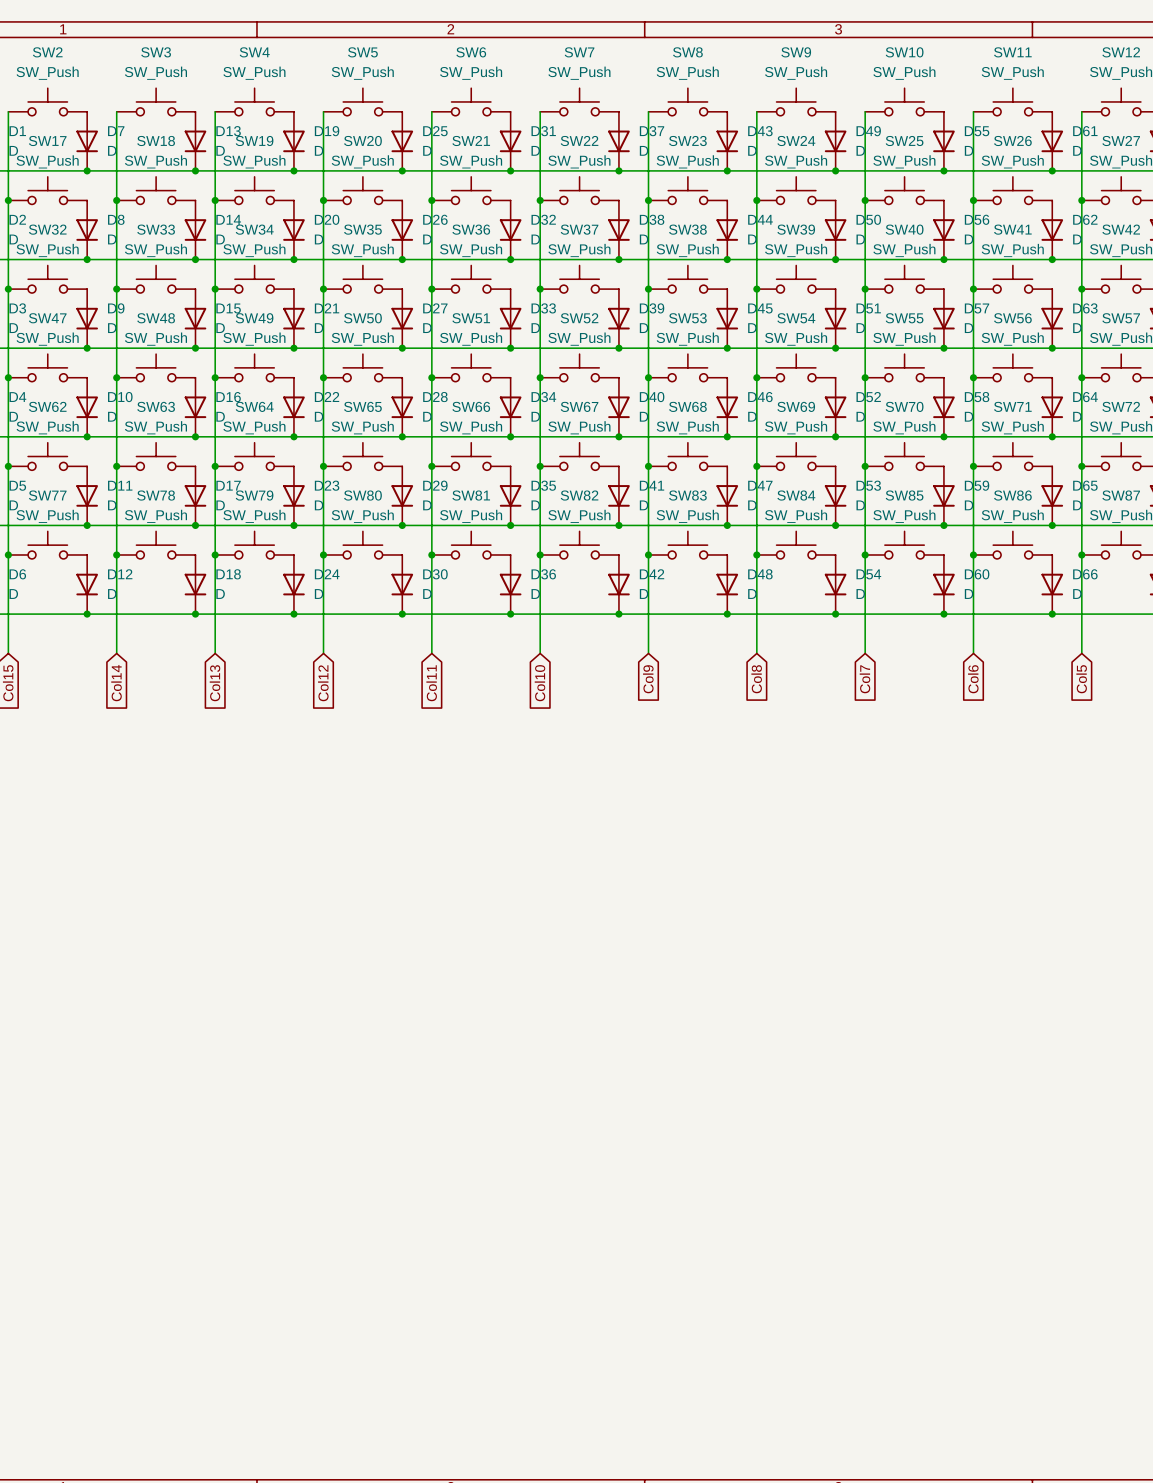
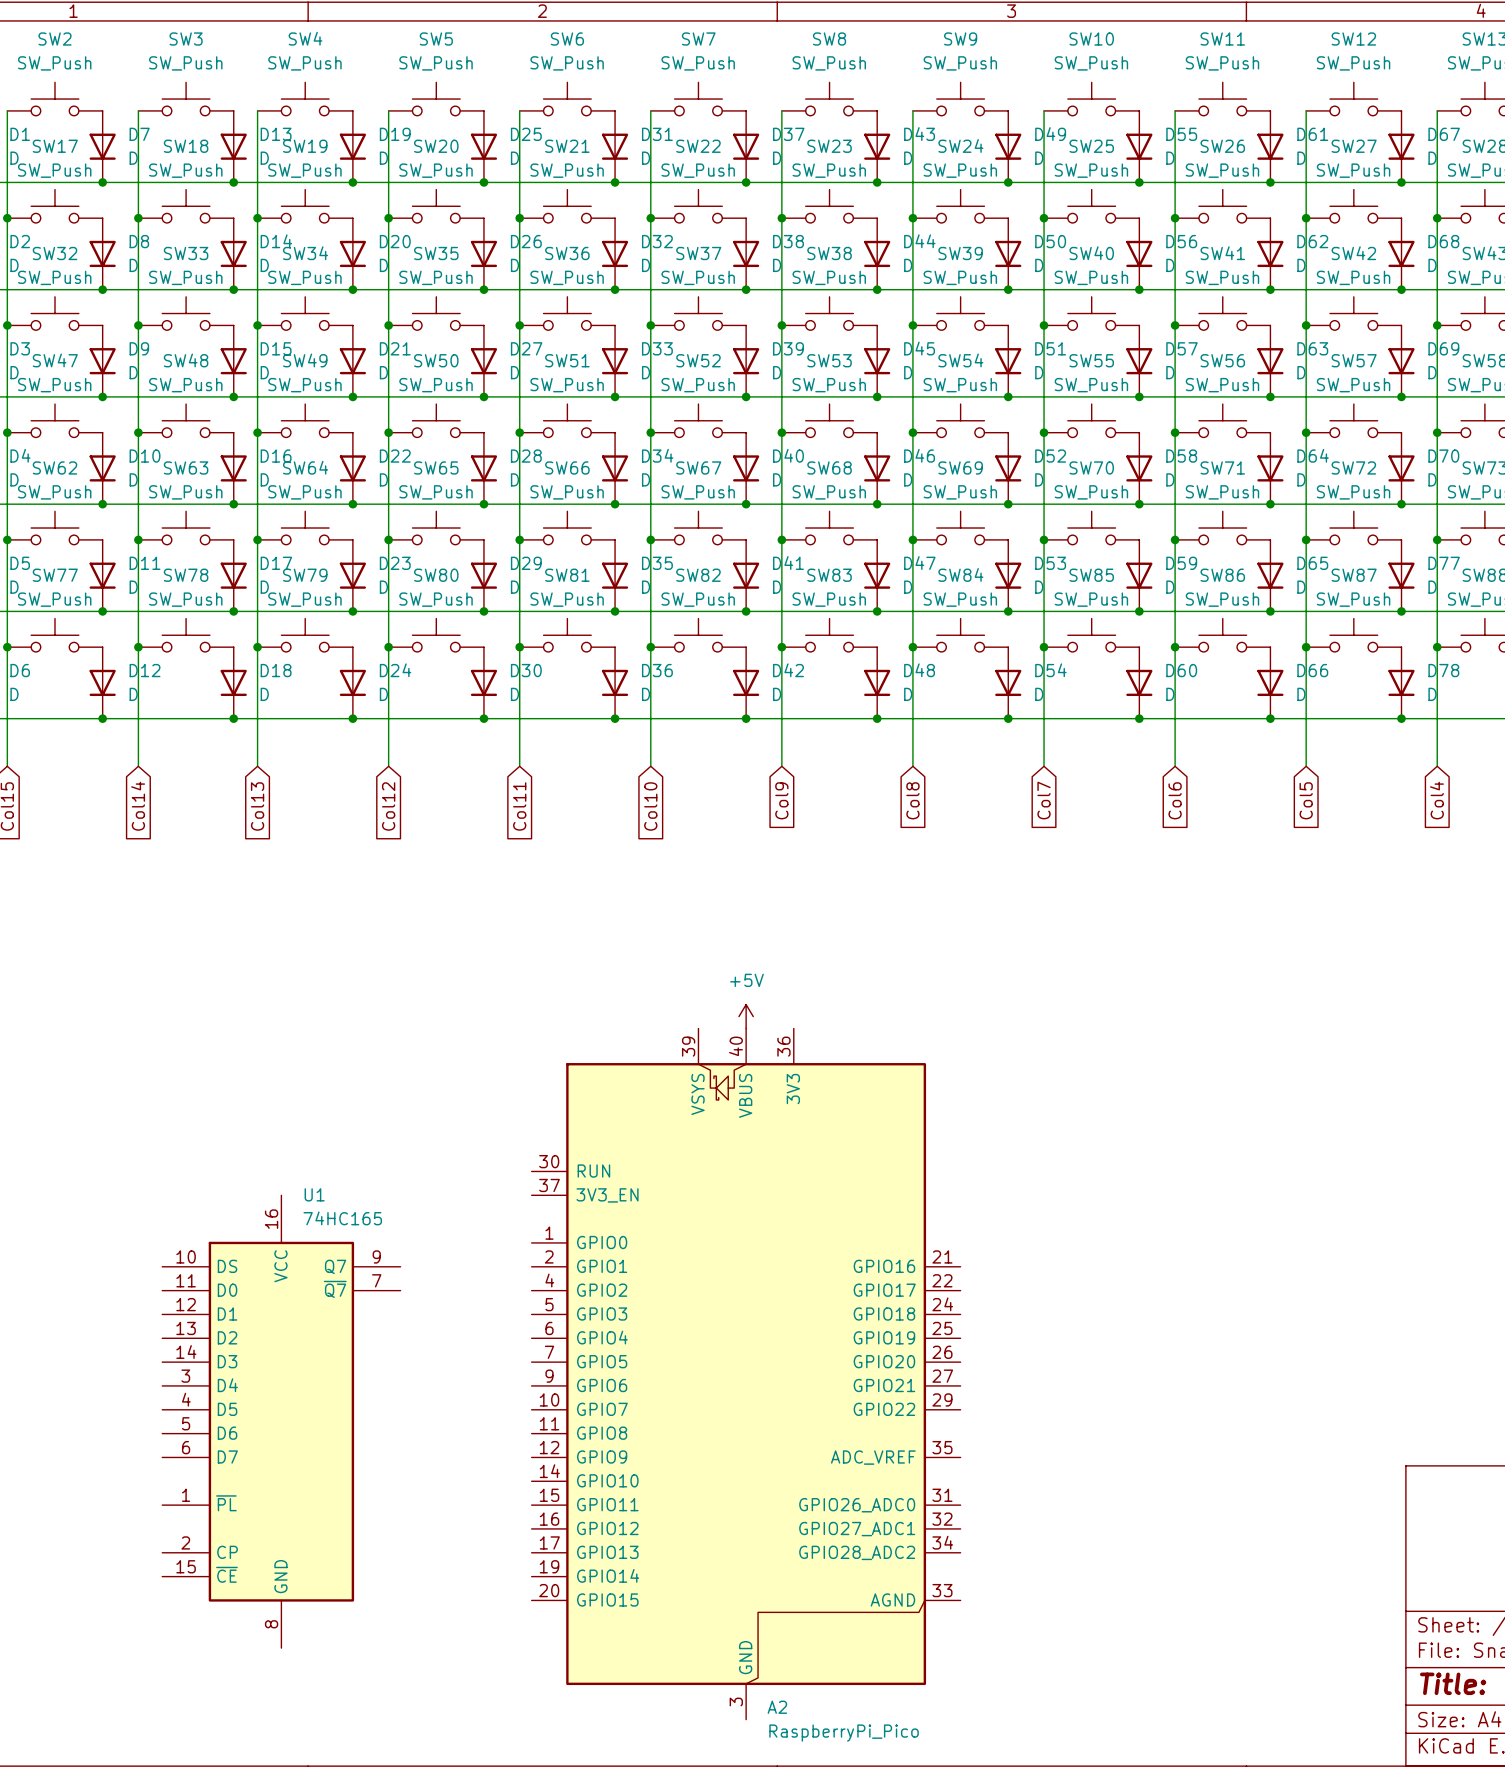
power symbol: none -> +5V (746, 1016)
A2: none -> RaspberryPi_Pico (746, 1374)
U1: none -> 74HC165 (281, 1421)

